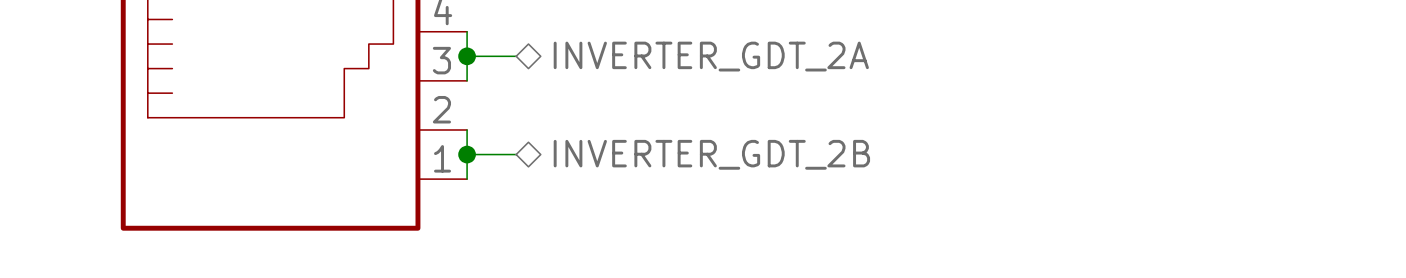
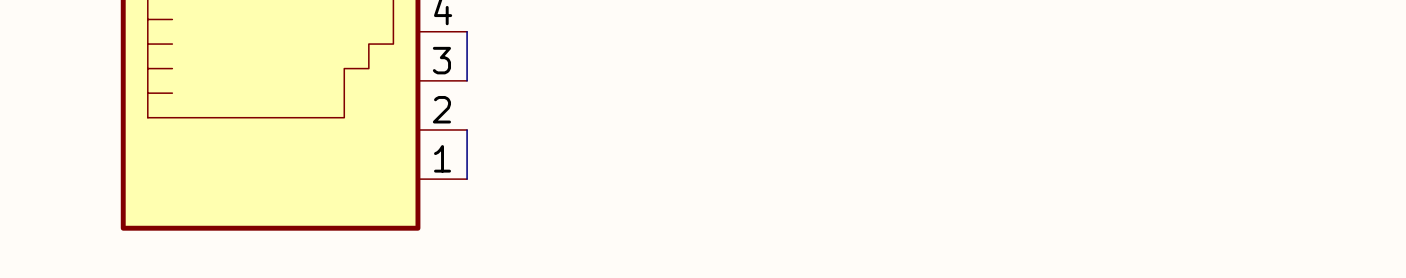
wire: (467, 56) (516, 56) -> none
junction: (467, 56) -> none
hierarchical label: INVERTER_GDT_2A (711, 56) -> none
wire: (467, 154) (516, 154) -> none
junction: (467, 154) -> none
hierarchical label: INVERTER_GDT_2B (711, 154) -> none

